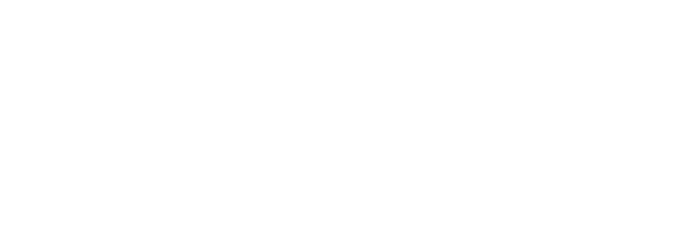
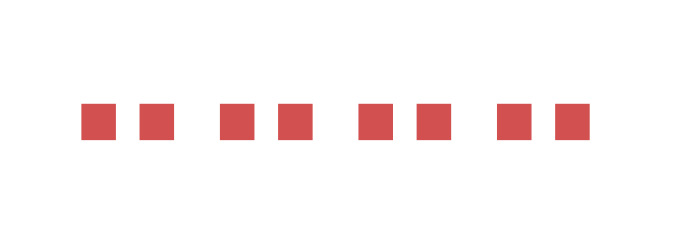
part: none -> (127, 121)
part: none -> (266, 121)
part: none -> (404, 121)
part: none -> (543, 121)

